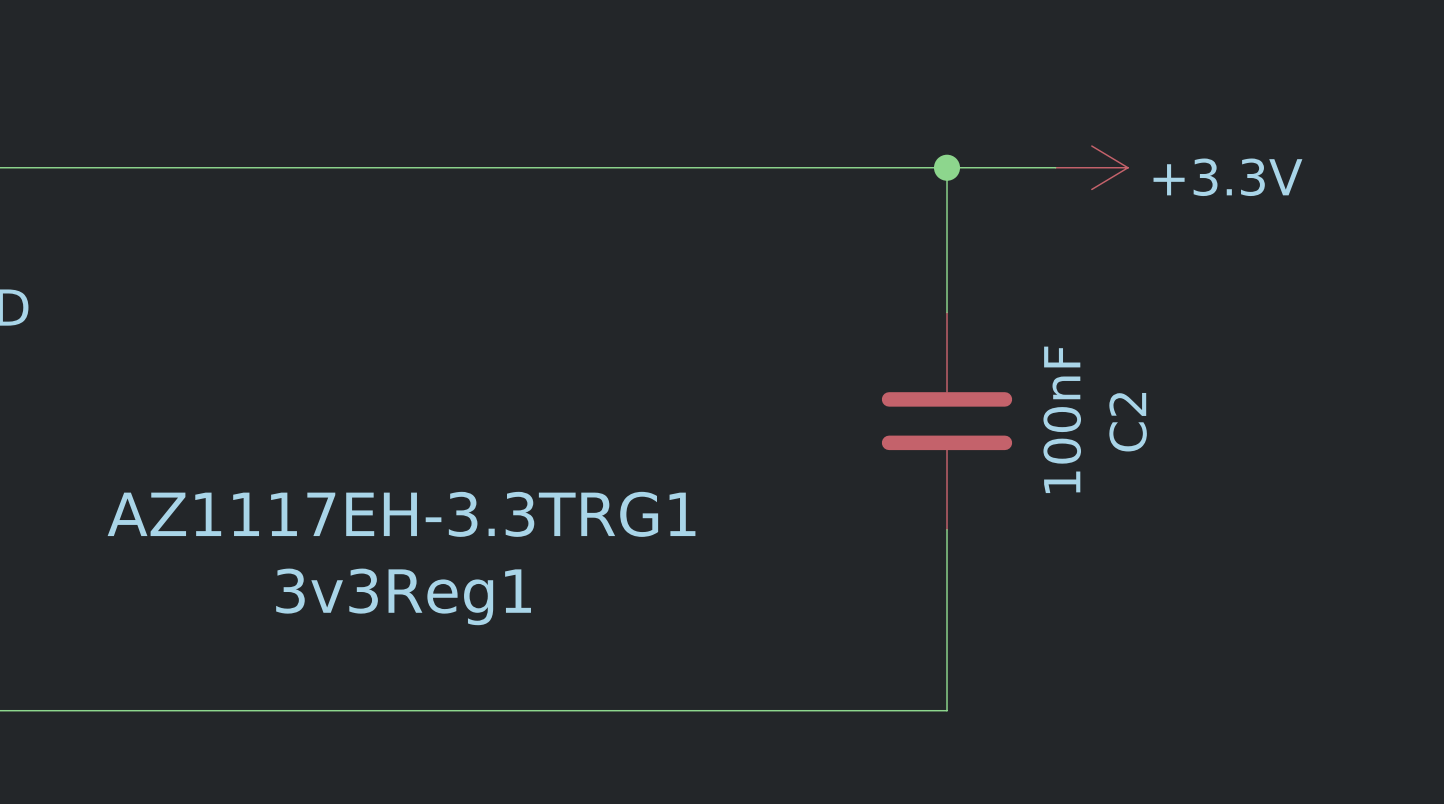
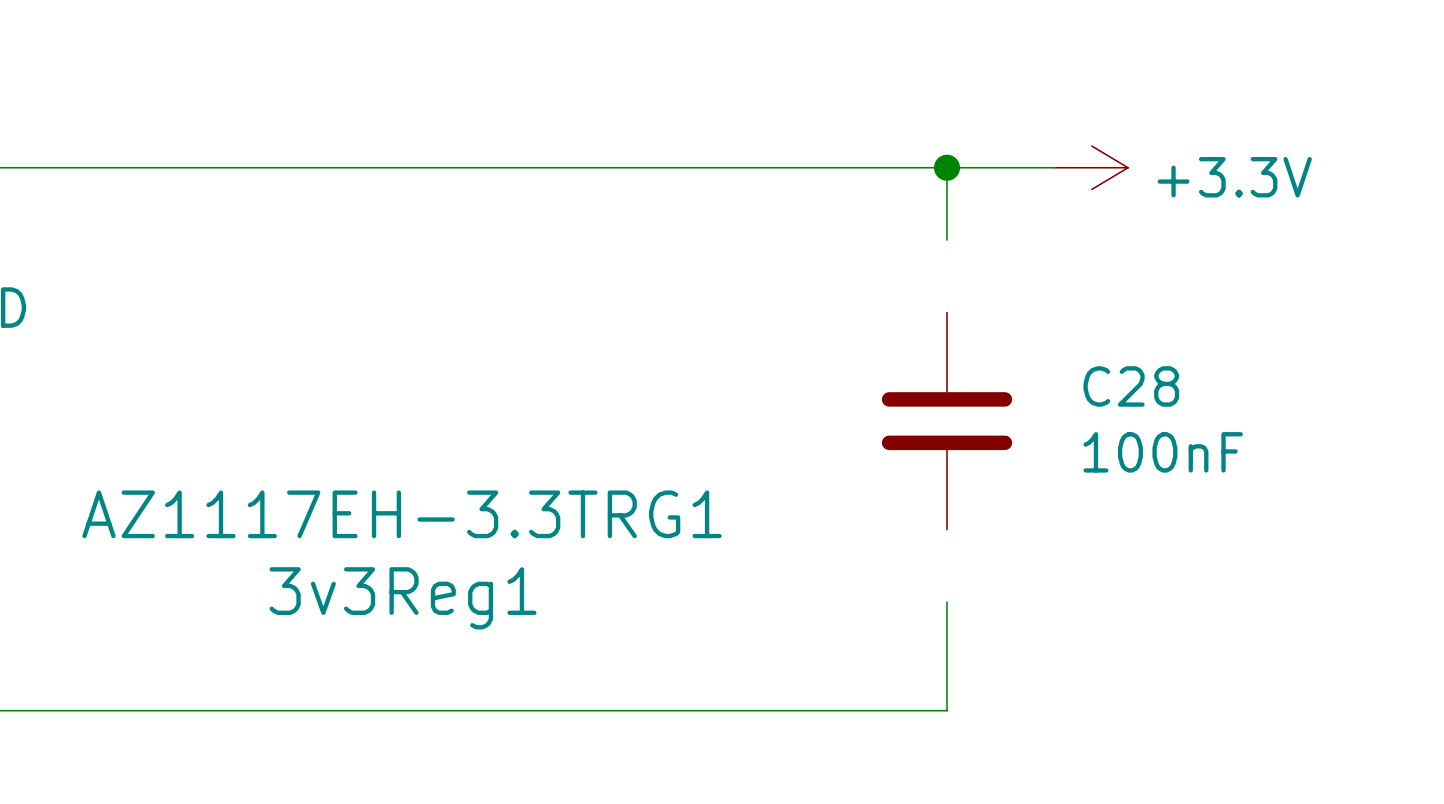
wire: (947, 240) (947, 312) -> none
C2 value rotation: 0° (1062, 419) -> 90° clockwise (1163, 452)
C2 name: C2 (1128, 422) -> C28 (1131, 386)
wire: (947, 529) (947, 602) -> none

